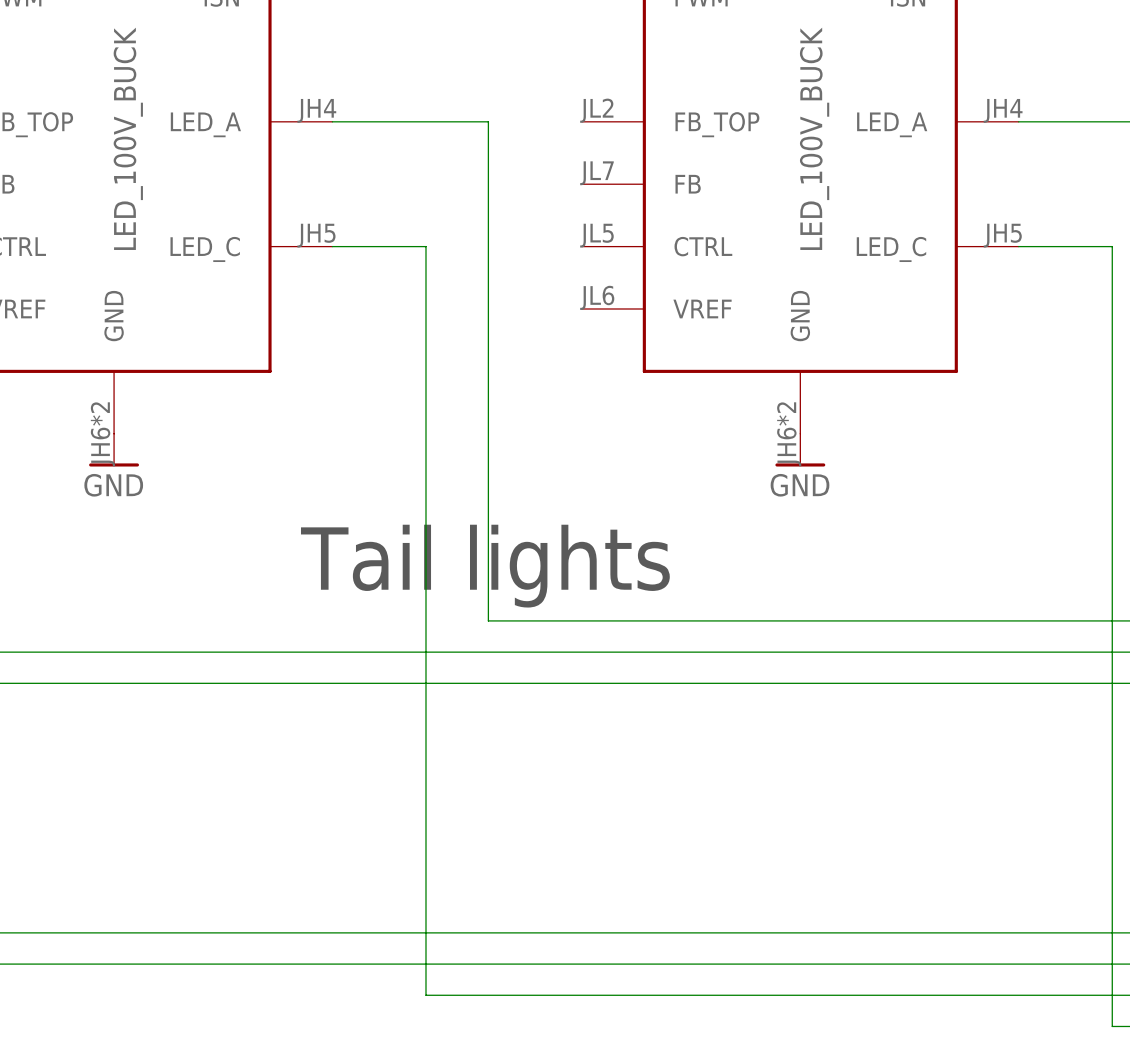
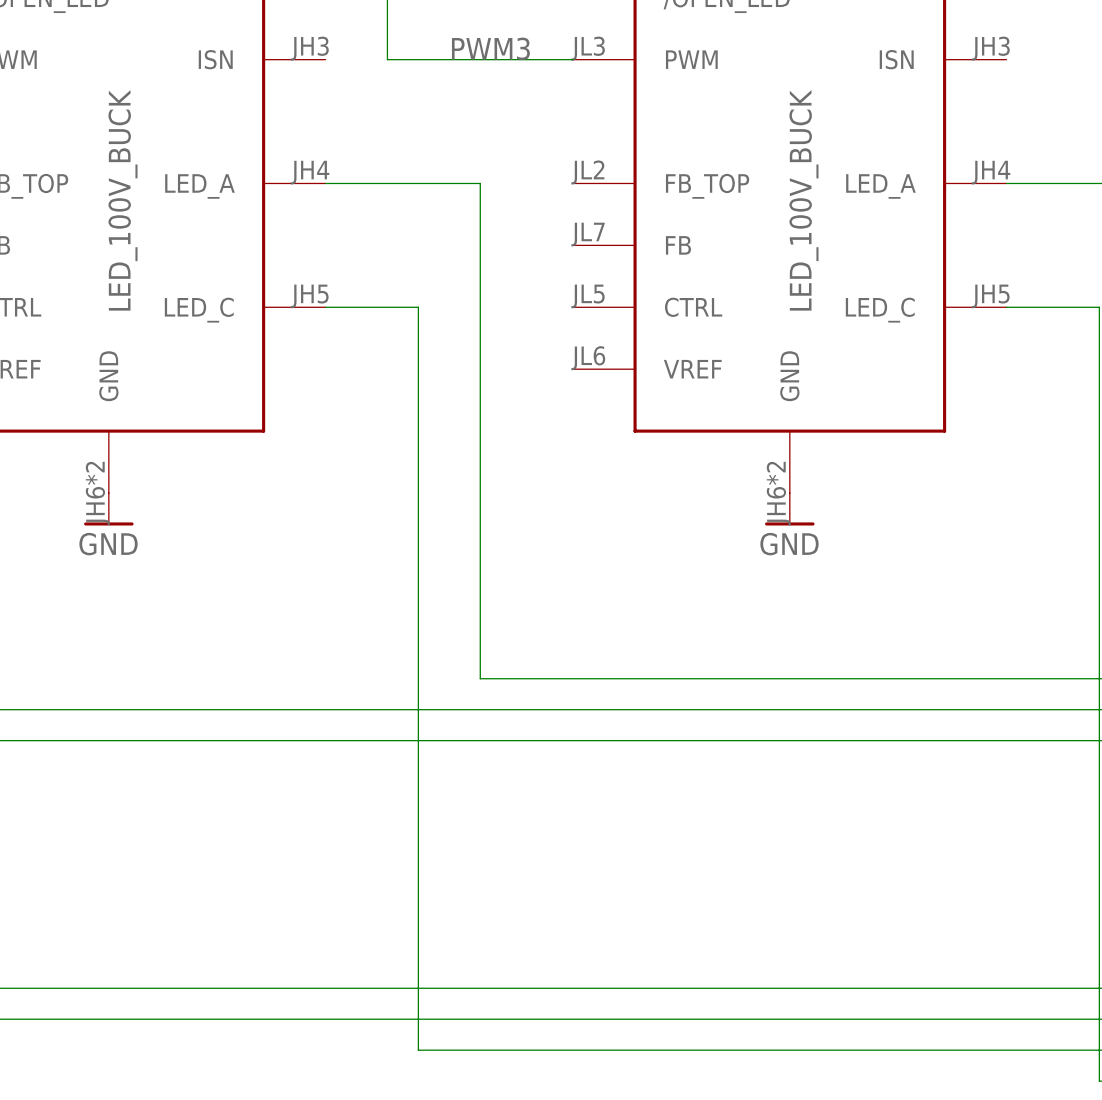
text: Tail lights (485, 566) -> none

